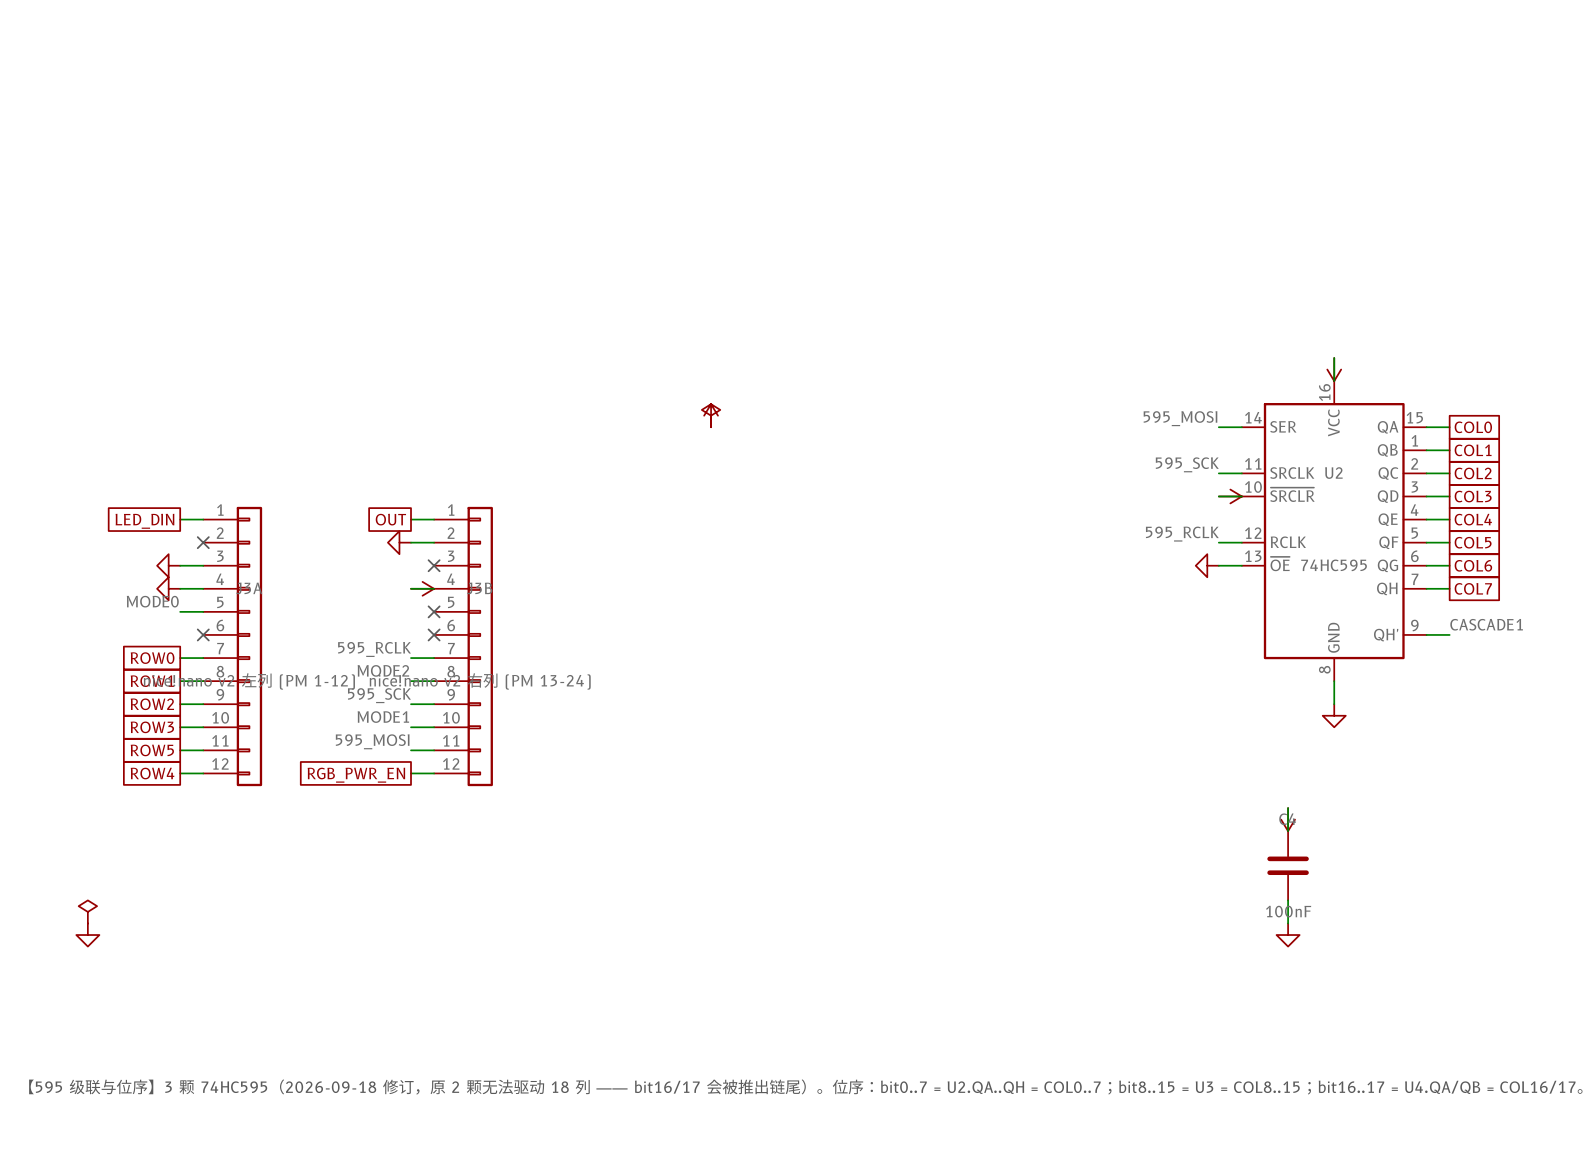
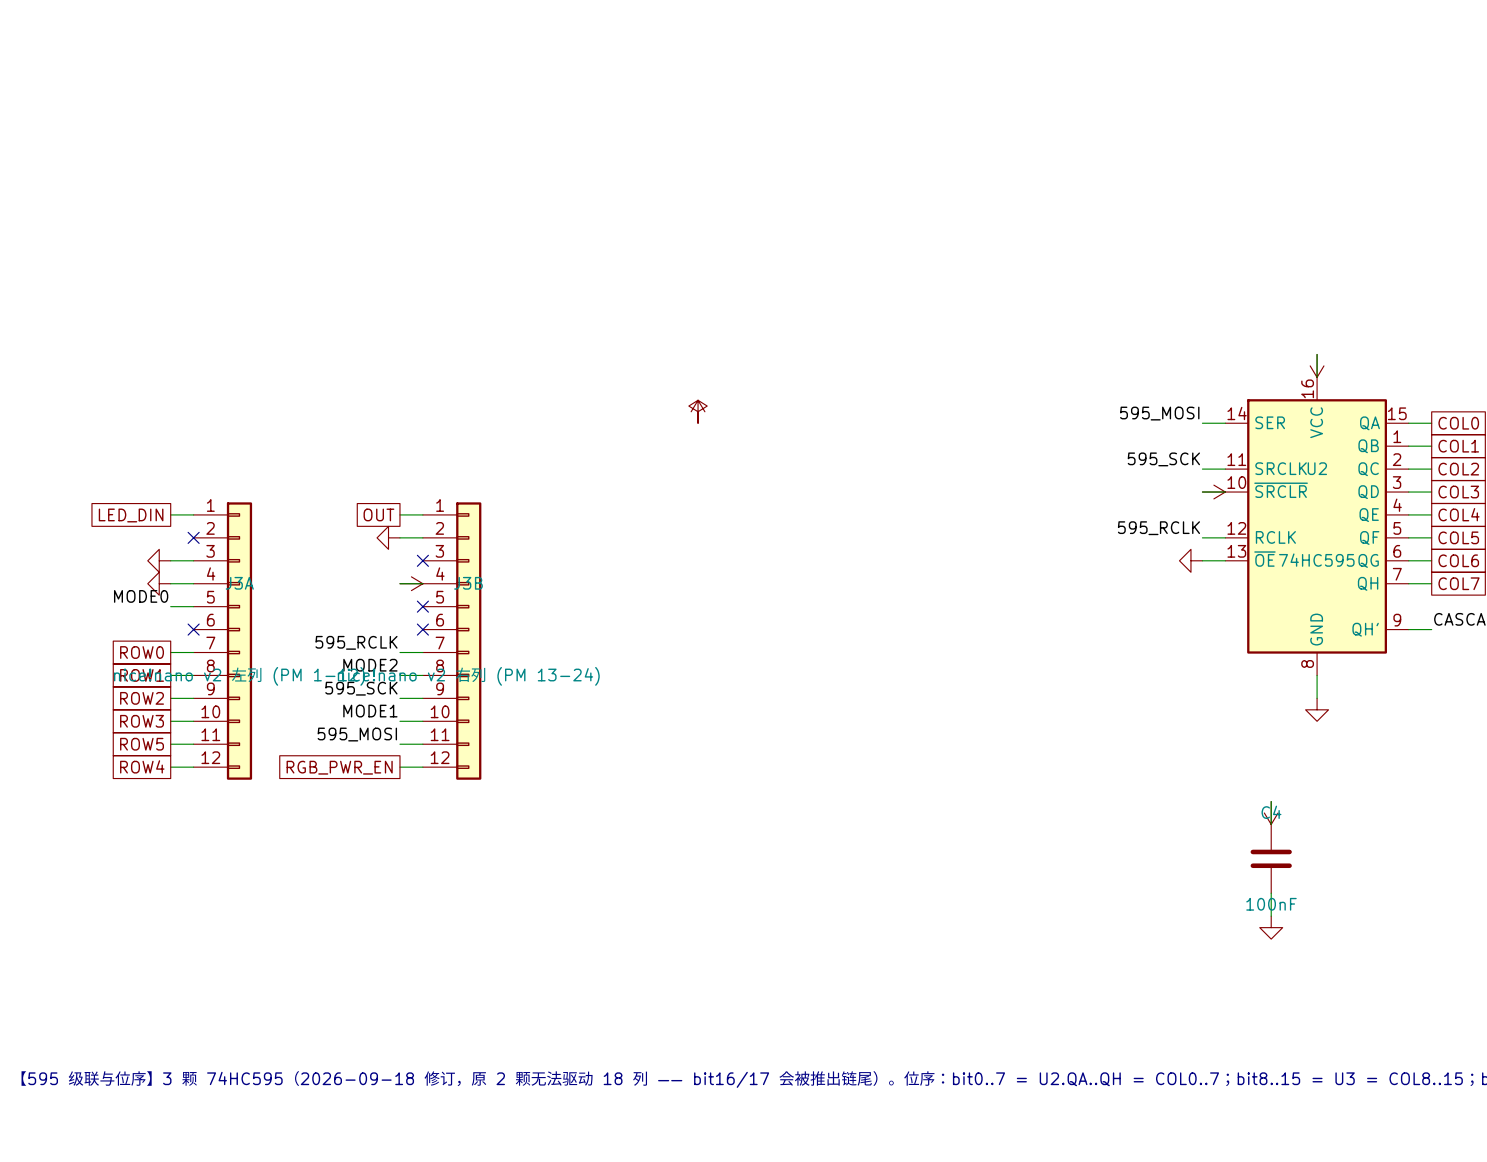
power symbol: (87, 911) -> none
power symbol: (87, 935) -> none

